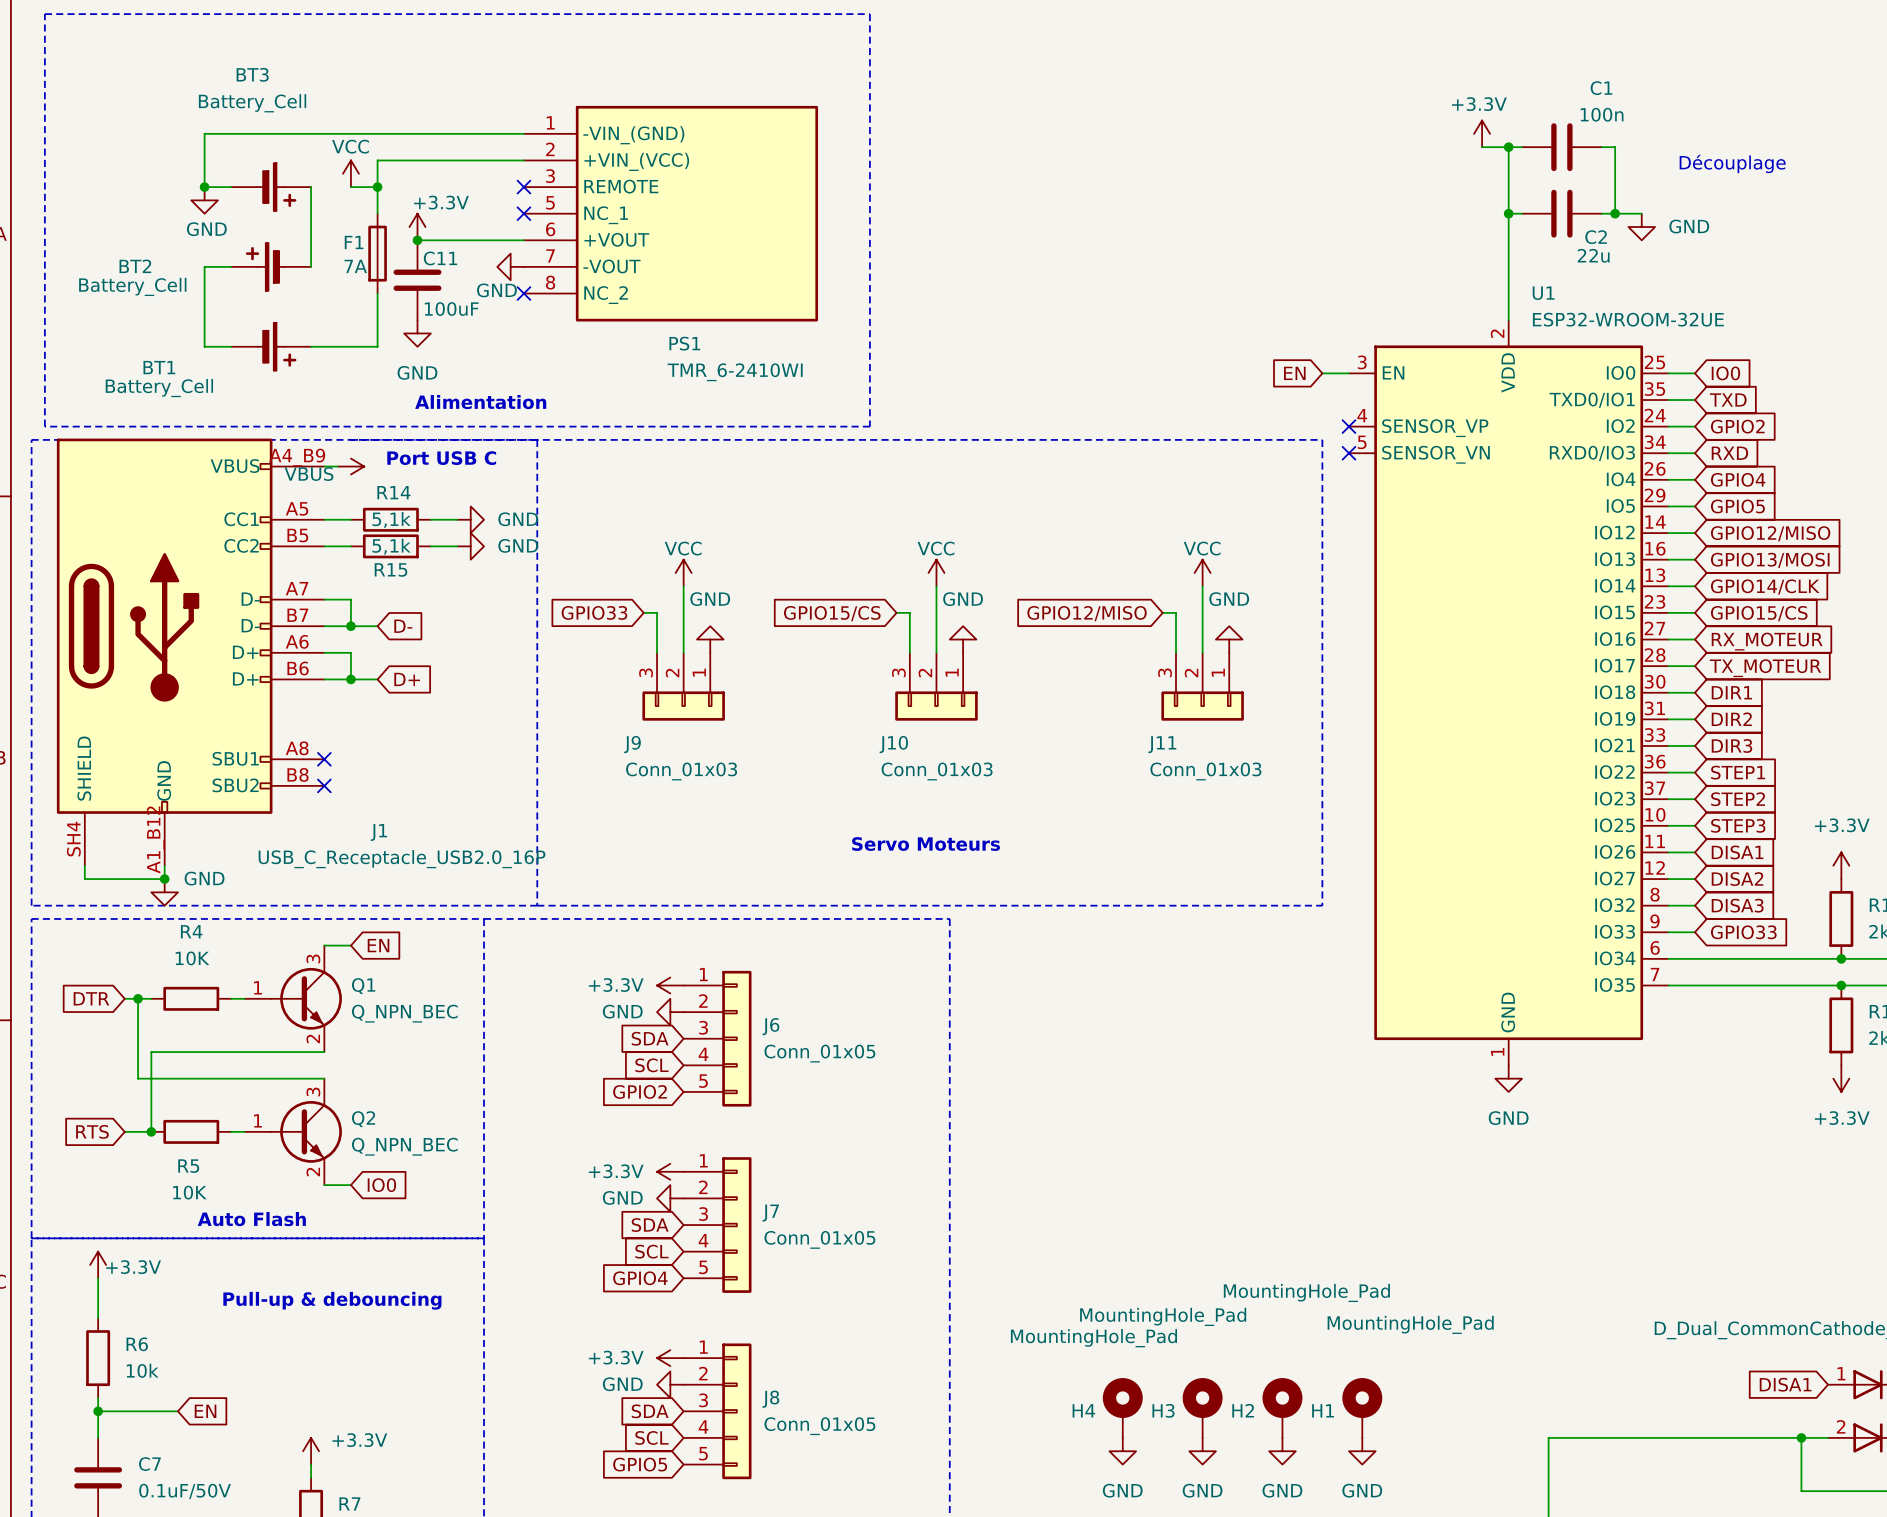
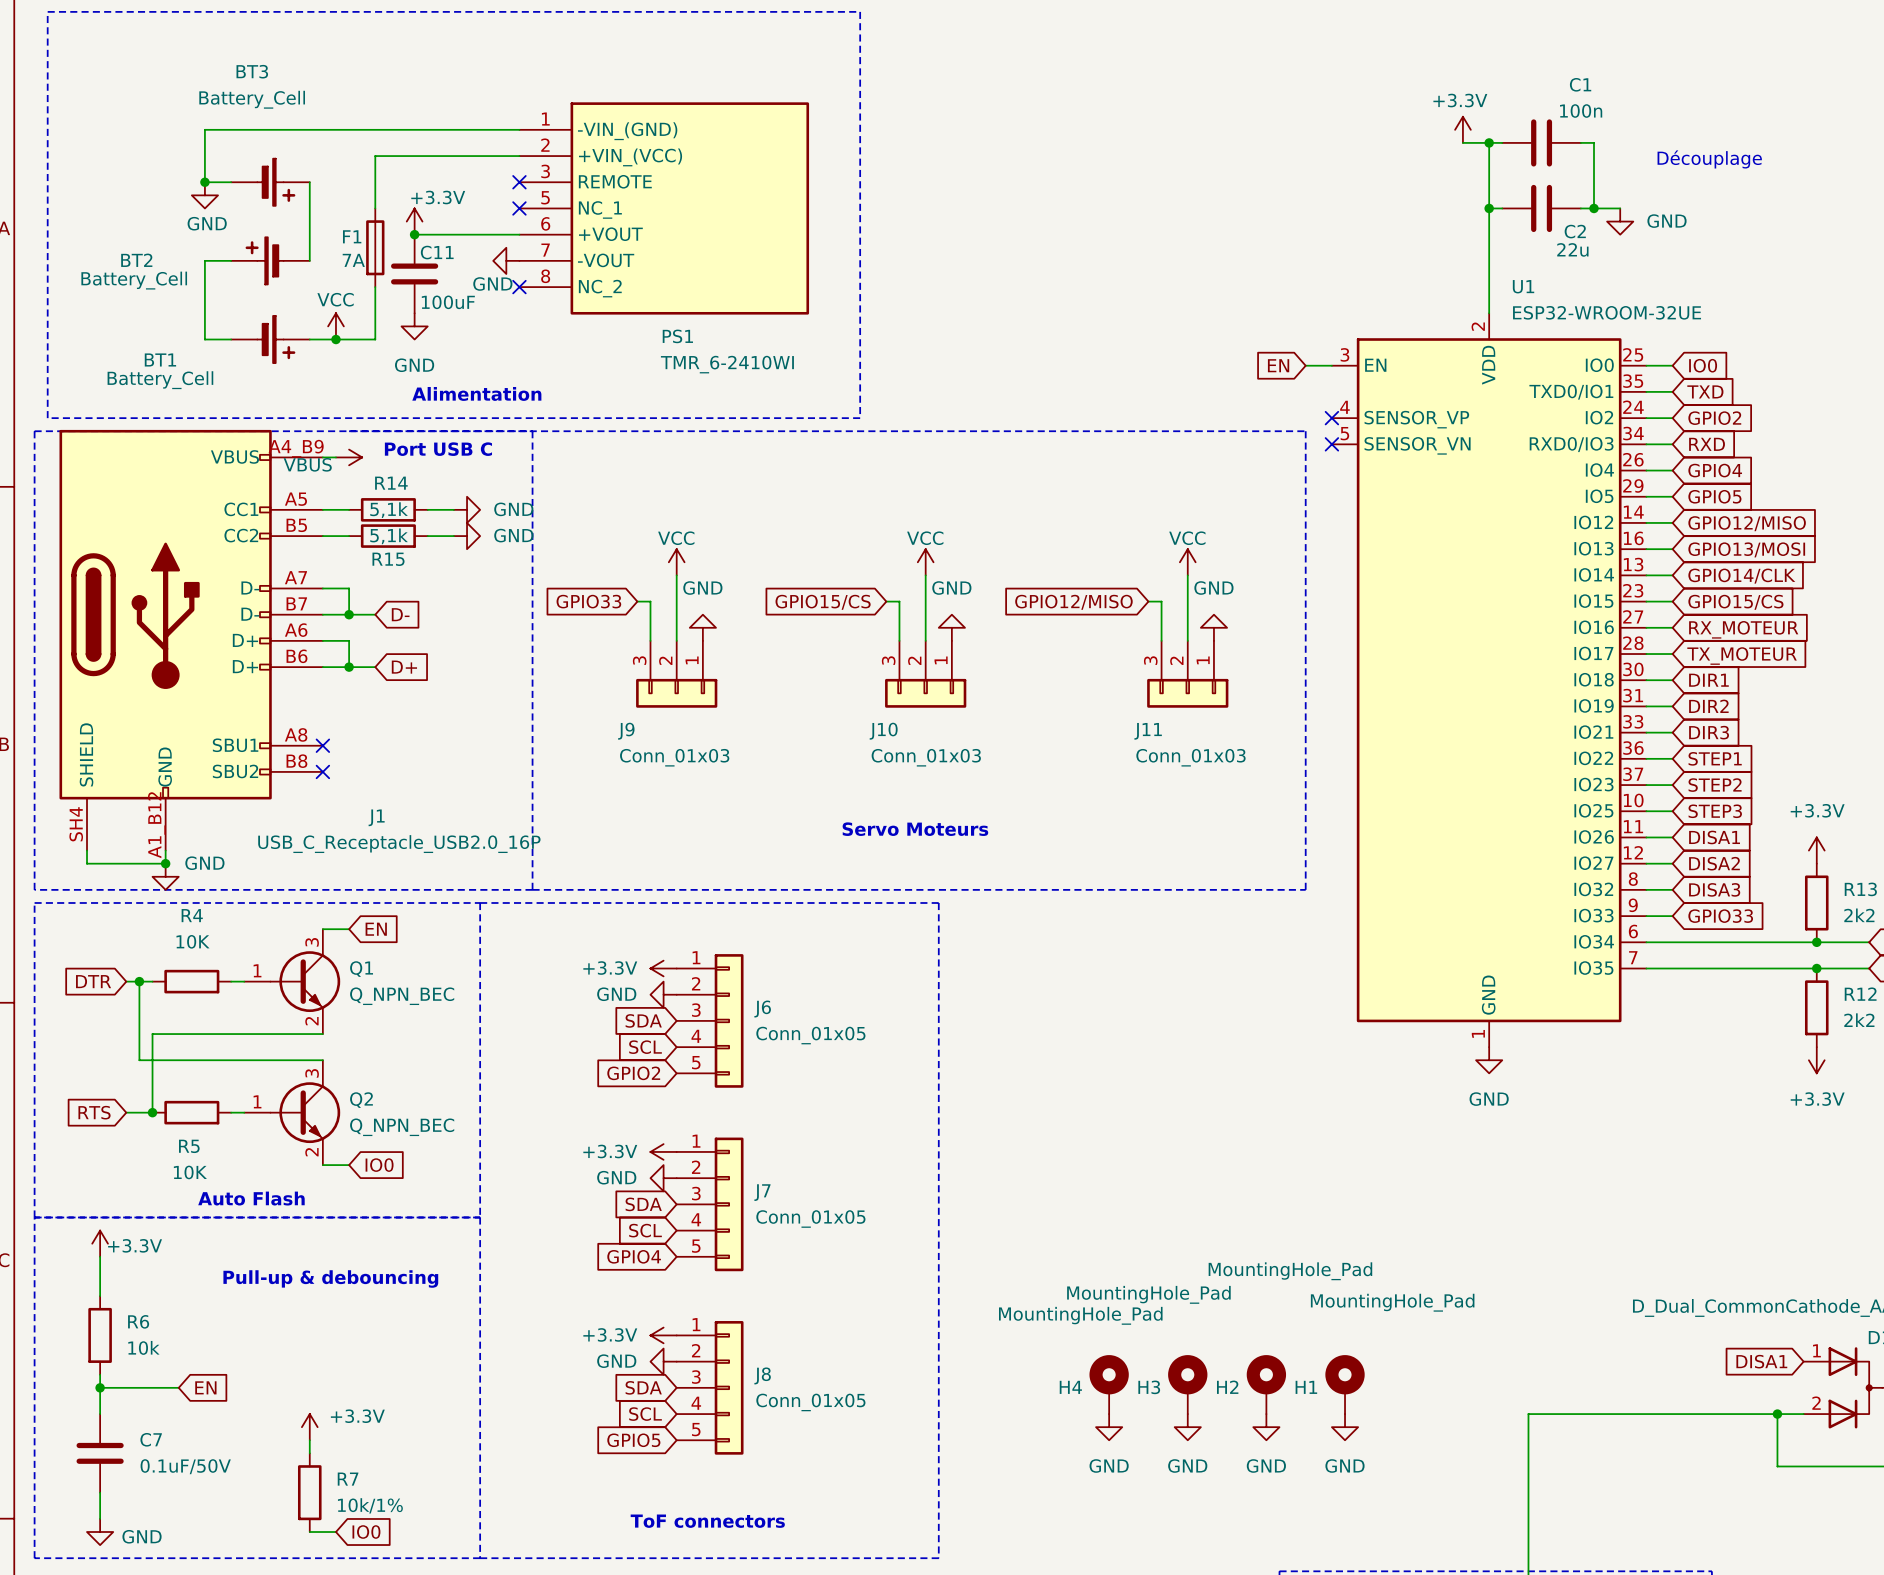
power symbol position: VCC (350, 173) -> VCC (335, 326)
wire: (350, 187) (377, 187) -> none
junction: (377, 187) -> none
junction: none -> (335, 339)

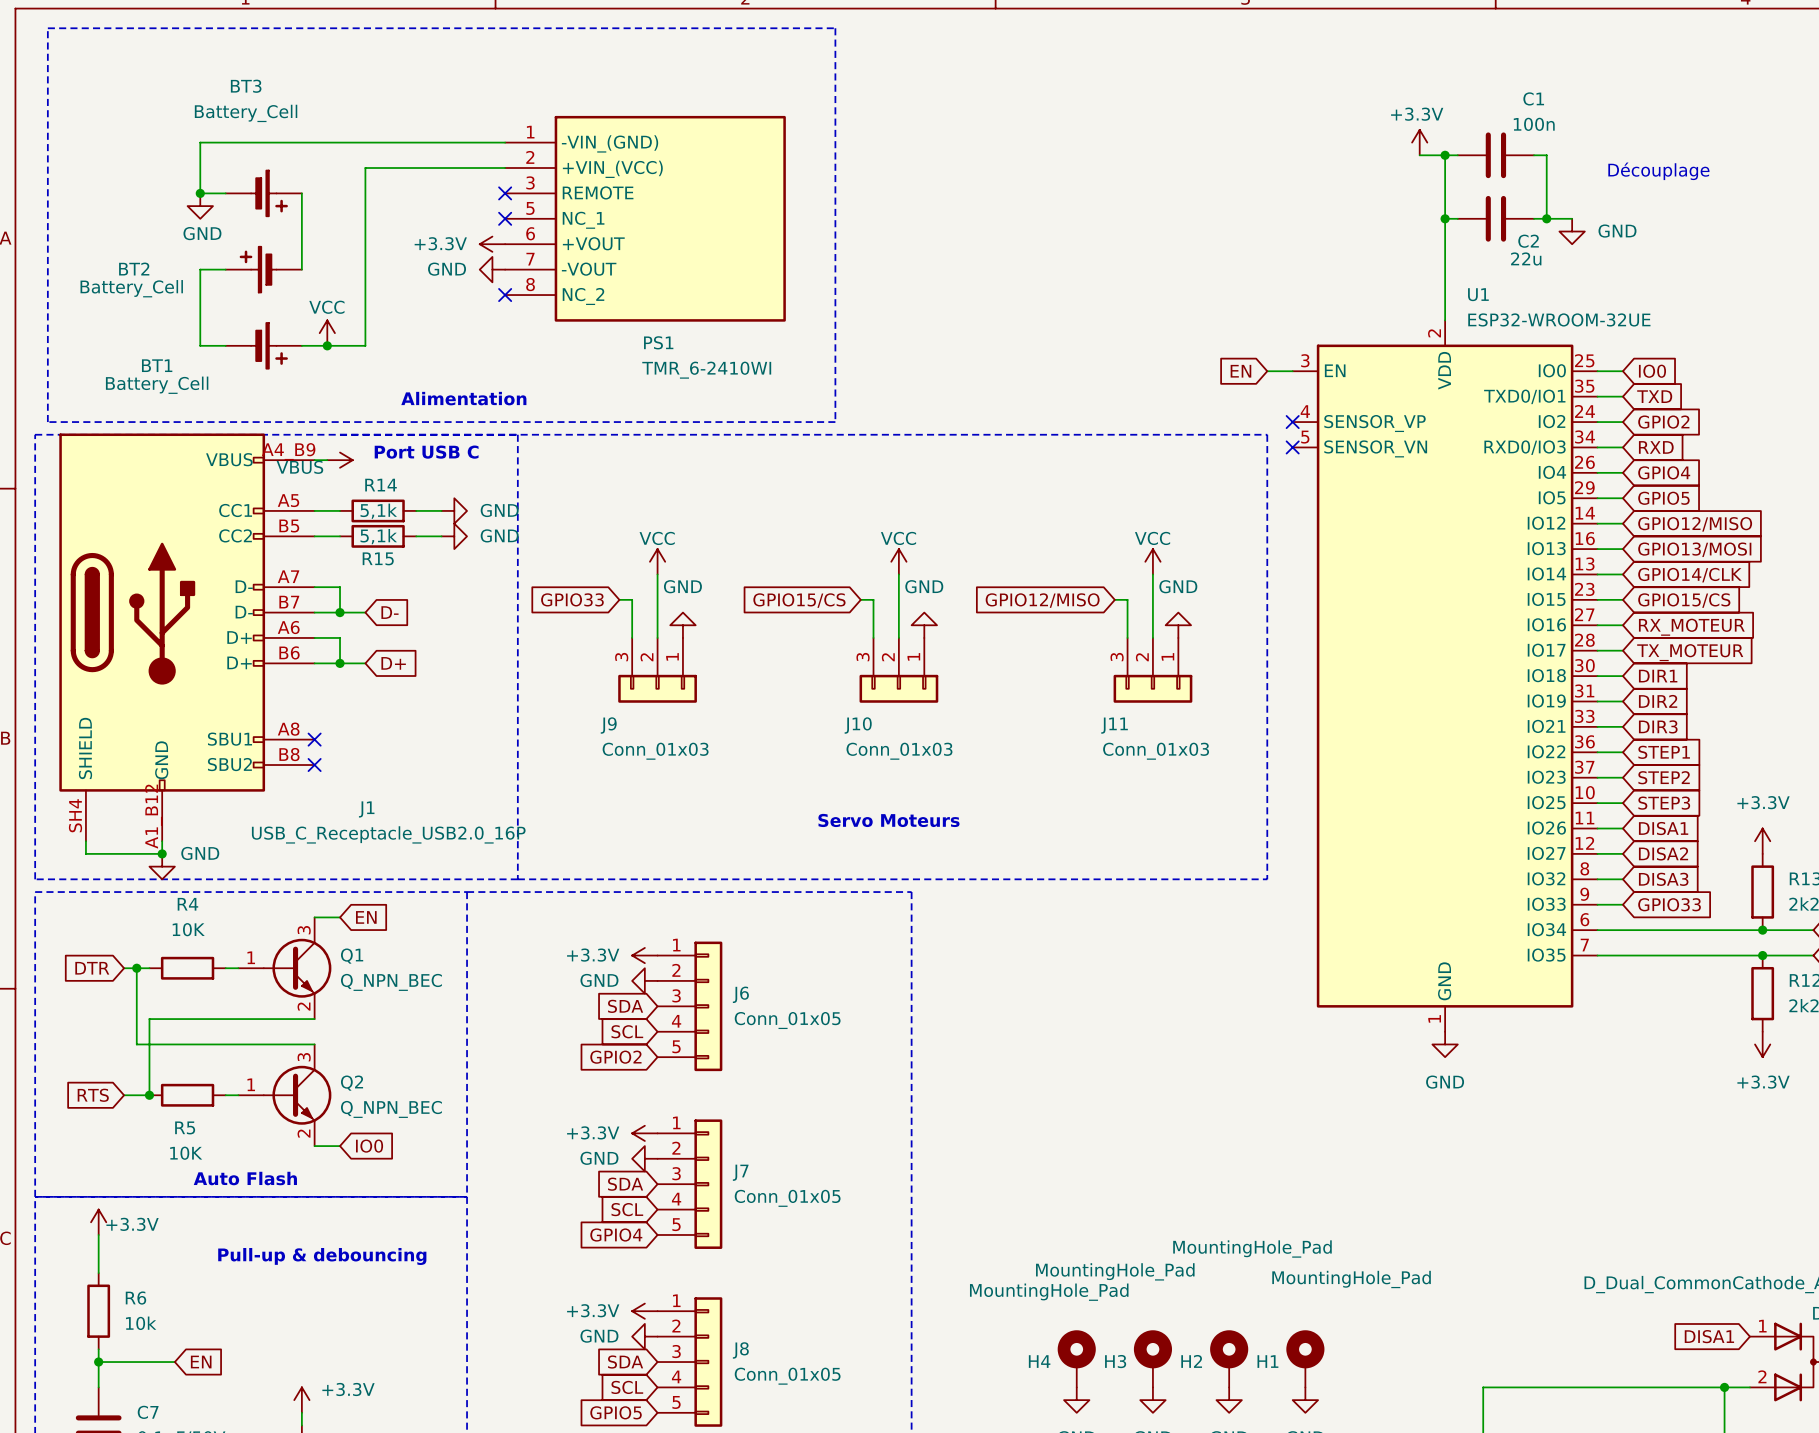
power symbol text position: +3.3V (438, 197) -> +3.3V (440, 243)
power symbol rotation: 0° (414, 221) -> 90° counterclockwise (492, 244)
power symbol position: +3.3V (414, 221) -> +3.3V (492, 244)
wire: (414, 234) (519, 234) -> none
junction: (414, 234) -> none
F1: 7A (375, 247) -> none
C11: 100uF (414, 273) -> none
power symbol text position: GND (492, 283) -> GND (447, 269)
power symbol: GND (414, 326) -> none

